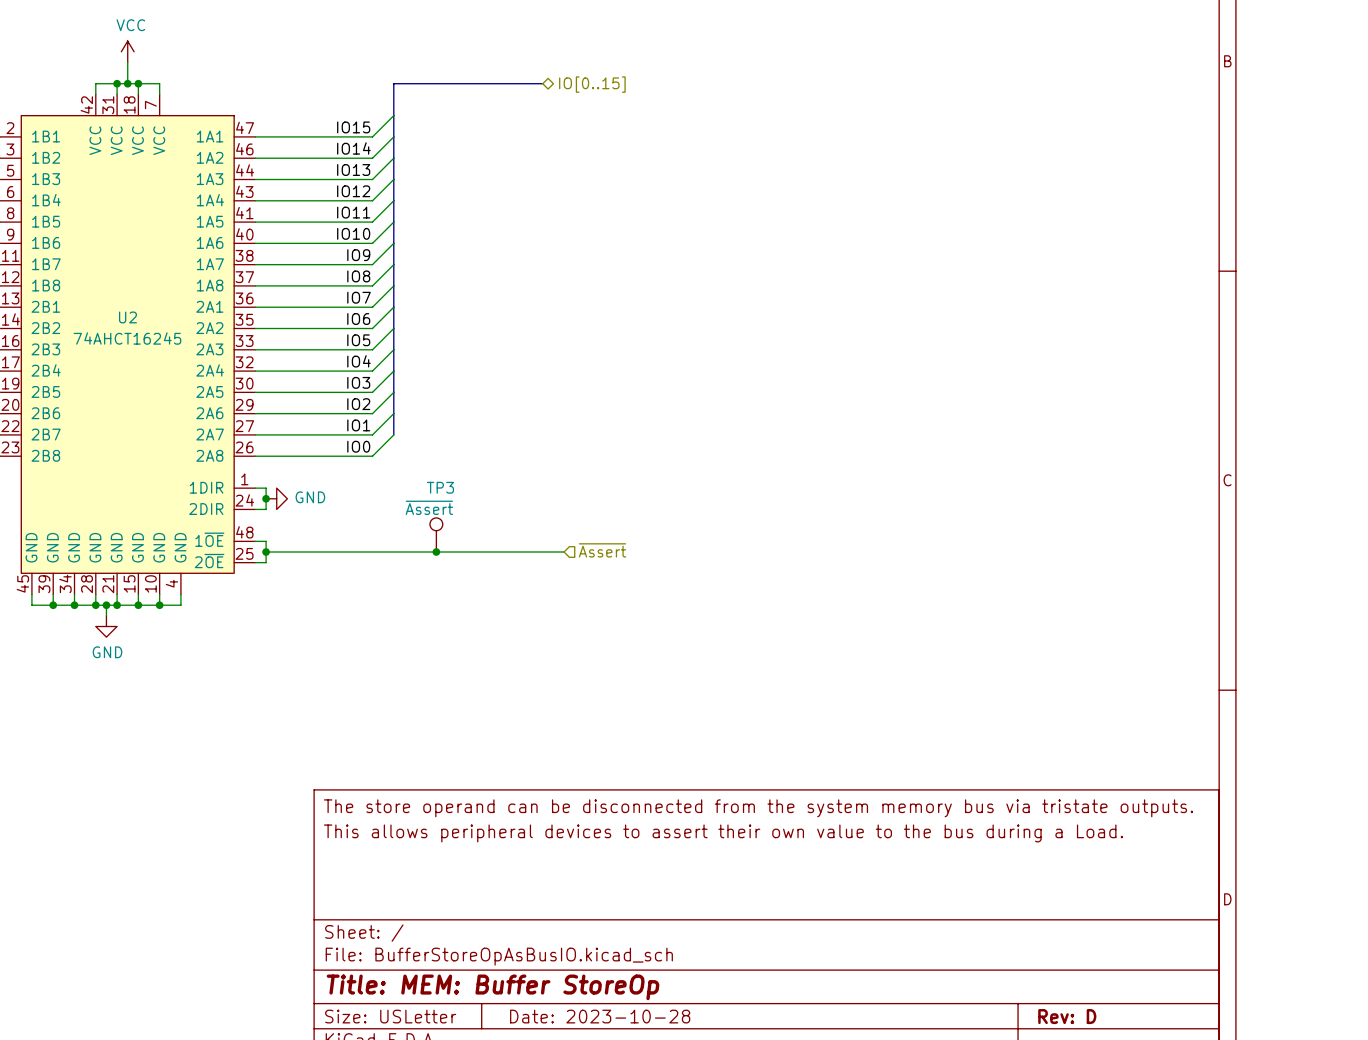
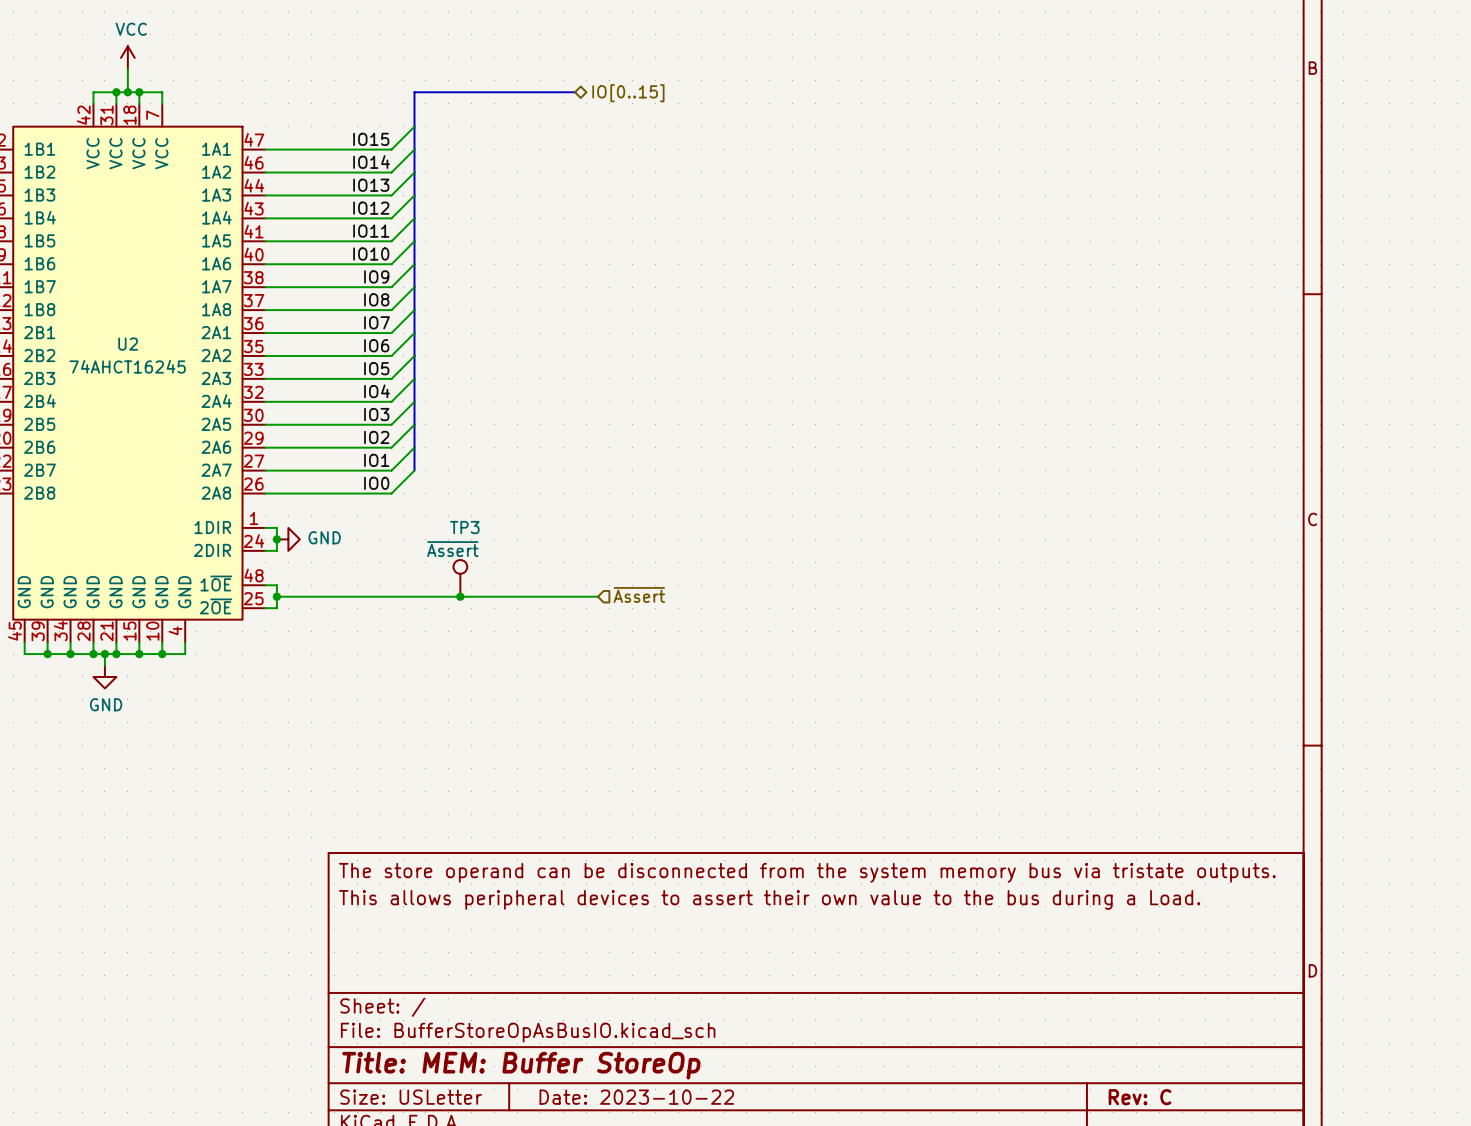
title block: Date: 2023-10-28 (600, 1016) -> Date: 2023-10-22 (636, 1097)
title block: Rev: D (1067, 1016) -> Rev: C (1140, 1097)

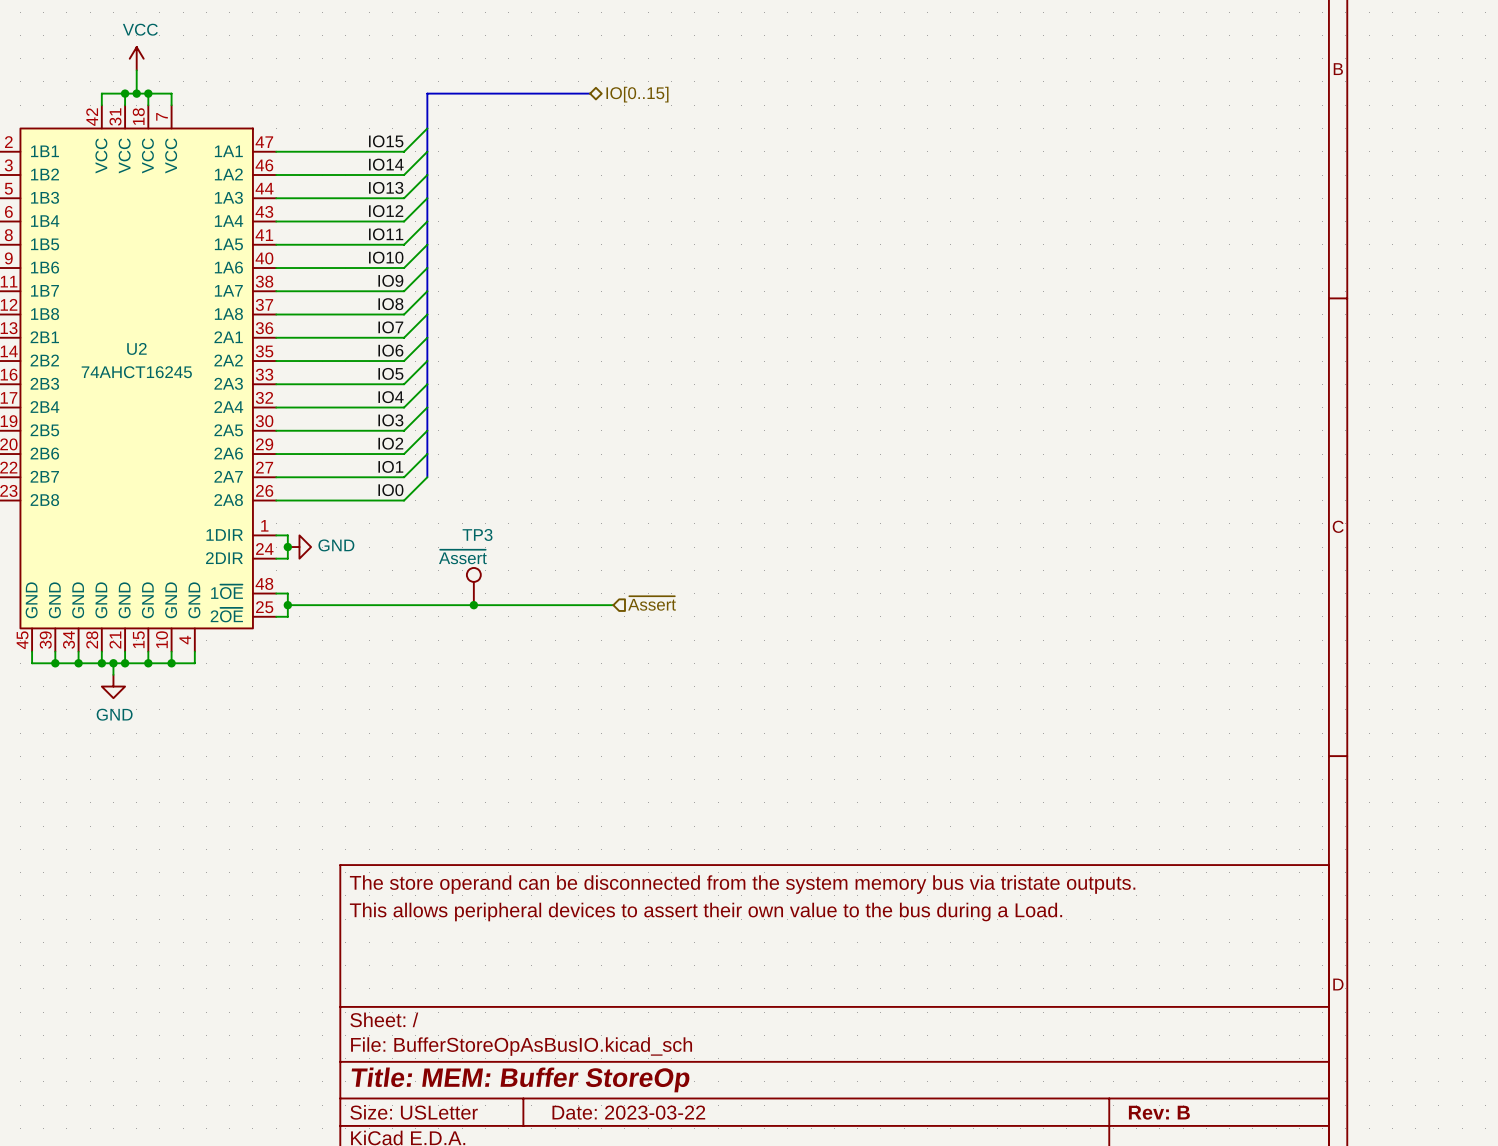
title block: Date: 2023-10-22 (636, 1097) -> Date: 2023-03-22 (628, 1112)
title block: Rev: C (1140, 1097) -> Rev: B (1159, 1112)

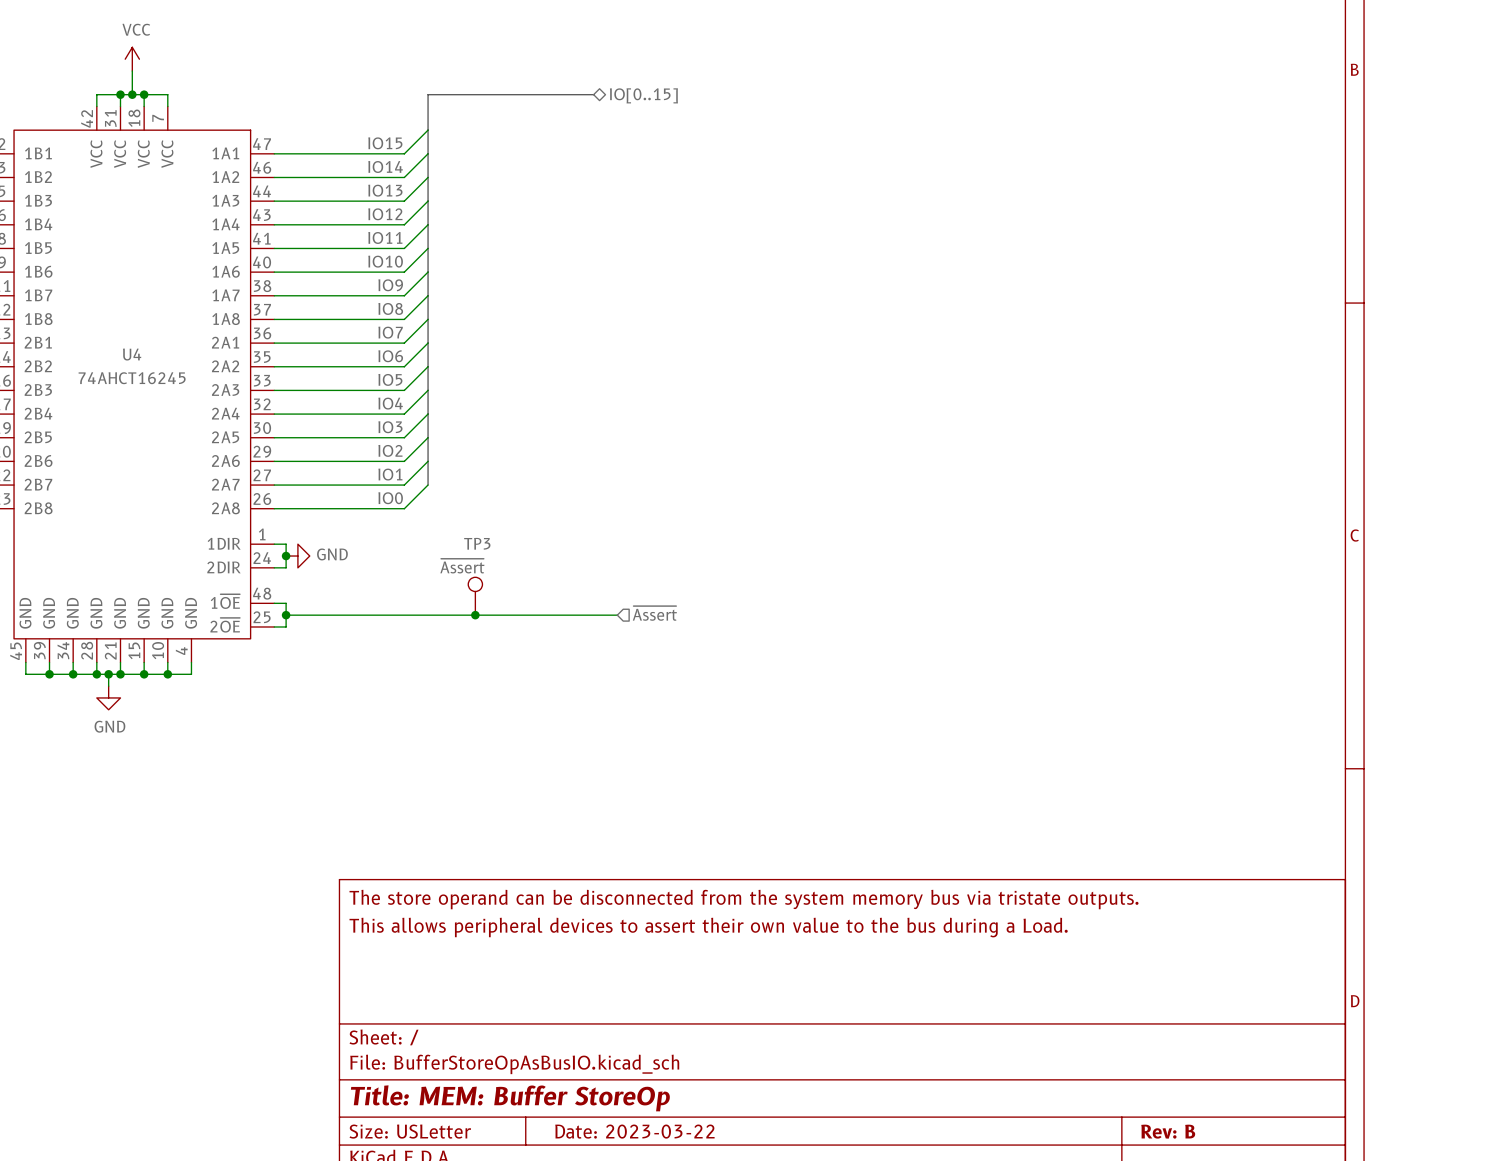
U2 name: U2 (136, 348) -> U4 (132, 354)

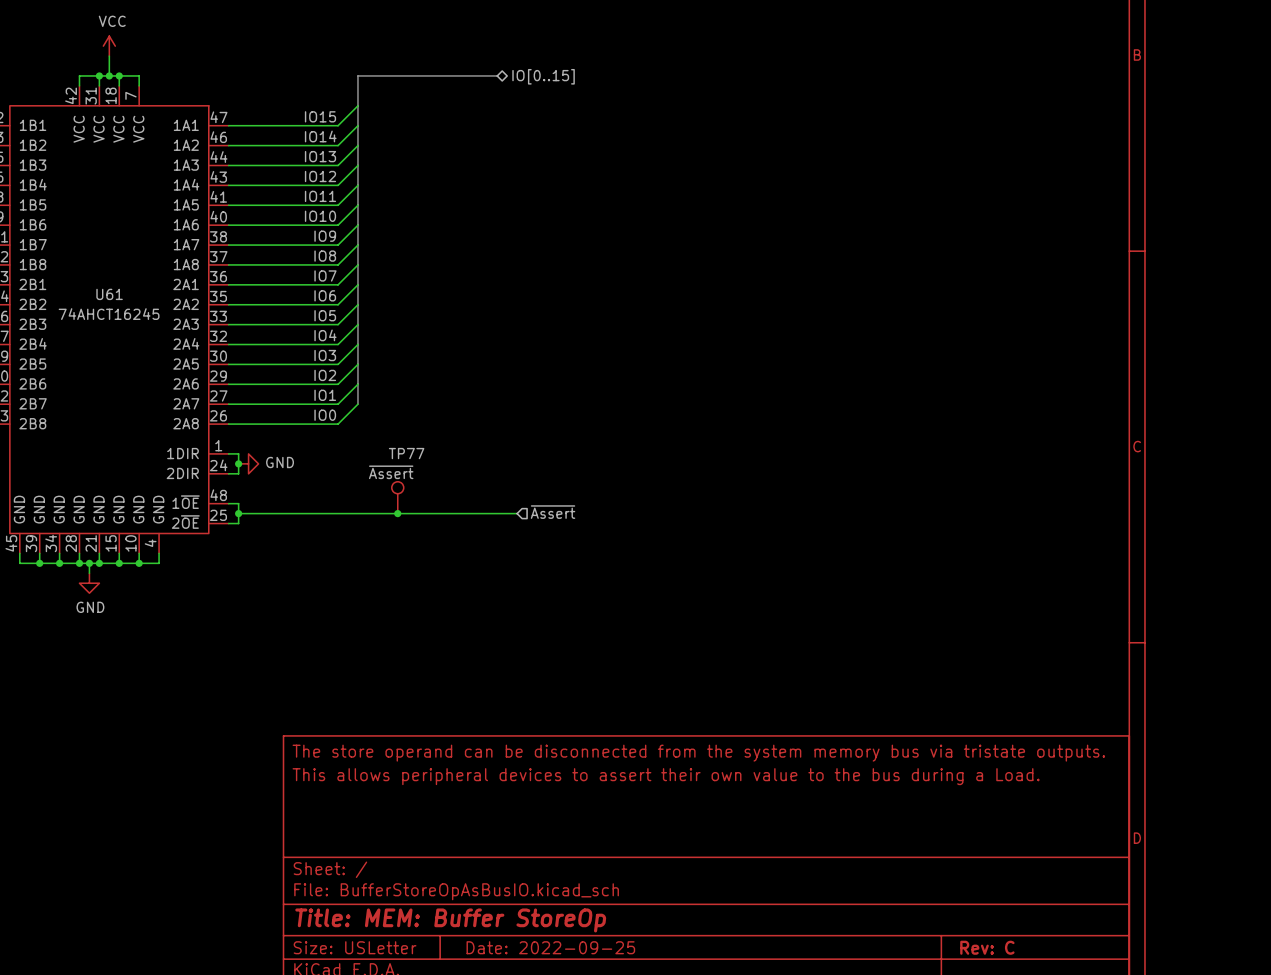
U4 name: U4 (132, 354) -> U61 (109, 294)
TP3 name: TP3 (477, 543) -> TP77 (406, 453)
title block: Date: 2023-03-22 (634, 1131) -> Date: 2022-09-25 (550, 947)
title block: Rev: B (1168, 1131) -> Rev: C (987, 947)

